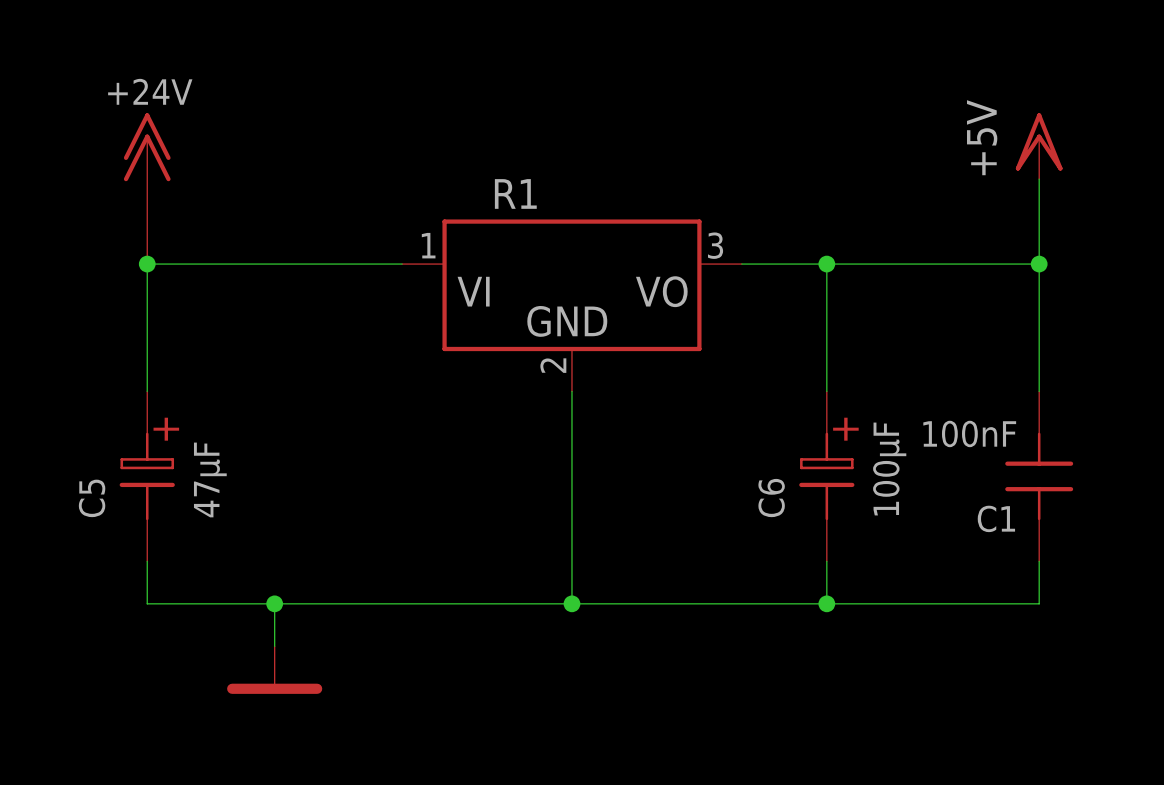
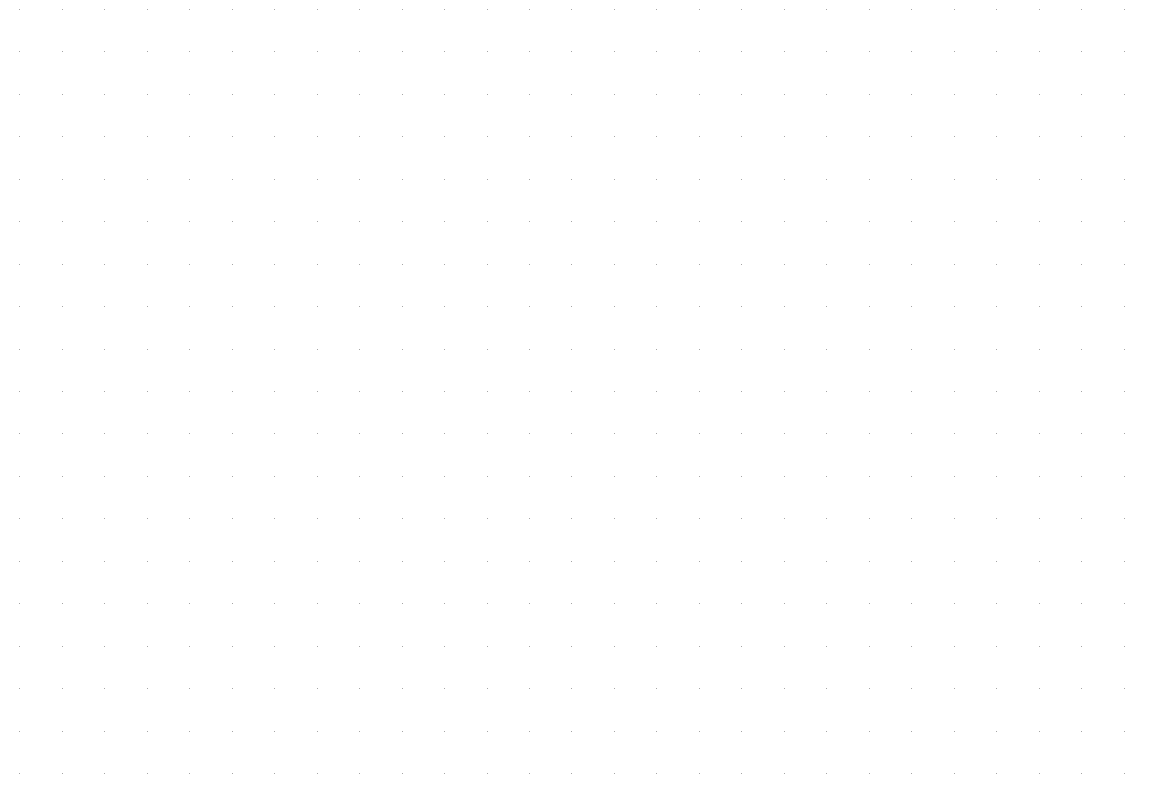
power symbol: +5V (1039, 146) -> none
wire: (1039, 179) (1039, 391) -> none
power symbol: (147, 188) -> none
junction: (147, 264) -> none
wire: (402, 264) (147, 264) (147, 391) -> none
wire: (741, 264) (1039, 264) -> none
wire: (826, 264) (826, 391) -> none
junction: (826, 264) -> none
junction: (1039, 264) -> none
R1: (571, 305) -> none
wire: (571, 391) (571, 603) -> none
C5: 47µF (147, 476) -> none
C6: 100µF (826, 476) -> none
C1: 100nF (1039, 476) -> none
wire: (147, 561) (147, 603) (1039, 603) (1039, 561) -> none
wire: (826, 561) (826, 603) -> none
wire: (274, 603) (274, 646) -> none
junction: (274, 603) -> none
junction: (571, 603) -> none
junction: (826, 603) -> none
power symbol: (274, 670) -> none

